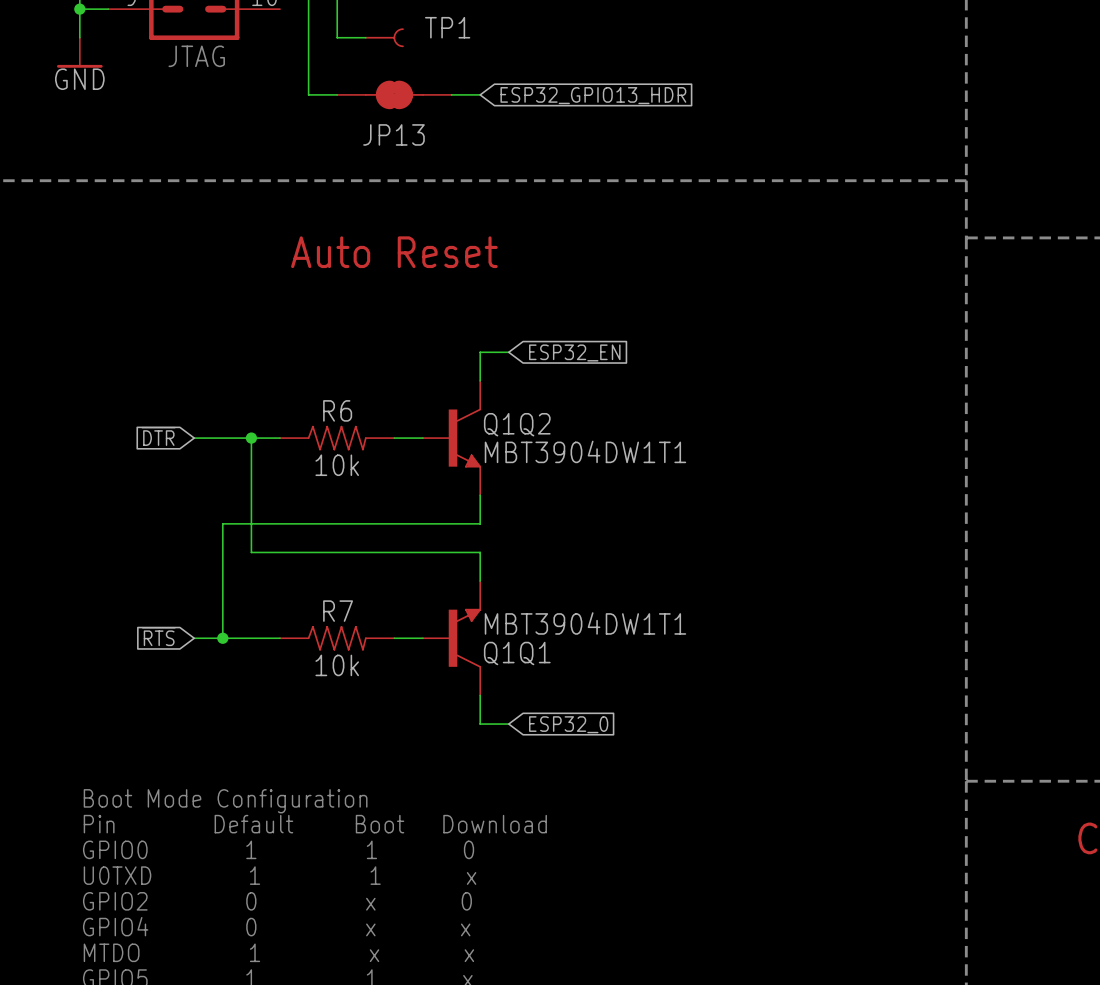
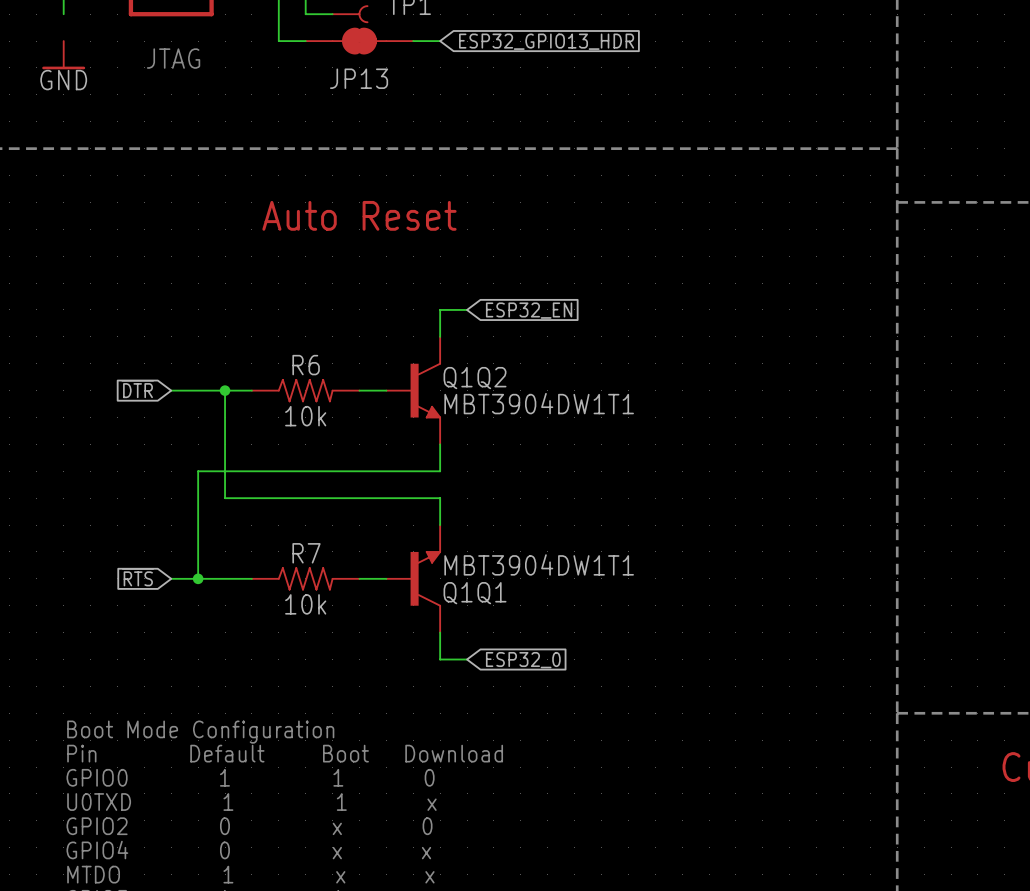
power symbol position: GND (79, 52) -> GND (63, 55)
text position: JTAG (196, 56) -> JTAG (173, 58)
wire: (308, 66) (308, 94) (337, 94) -> (278, 41) (305, 41)
JP13 position: (394, 94) -> (359, 41)
wire: (451, 94) (480, 94) -> (413, 41) (440, 41)
global label position: ESP32_GPIO13_HDR (593, 95) -> ESP32_GPIO13_HDR (546, 41)

